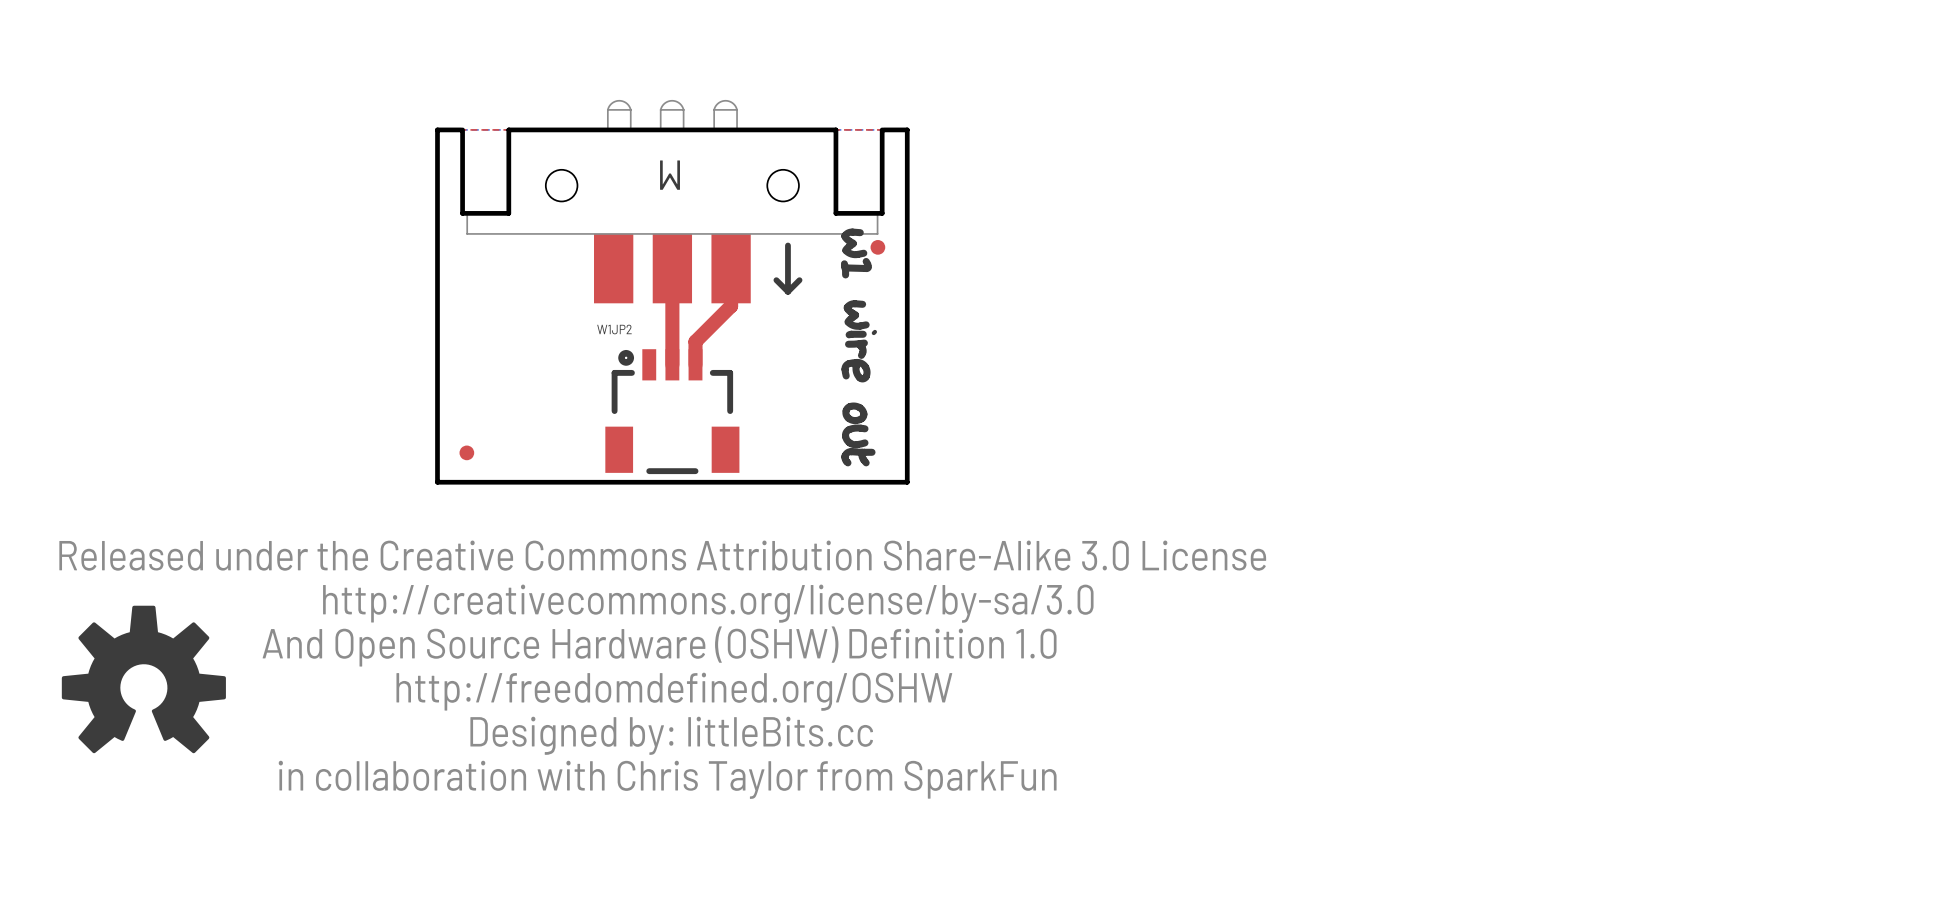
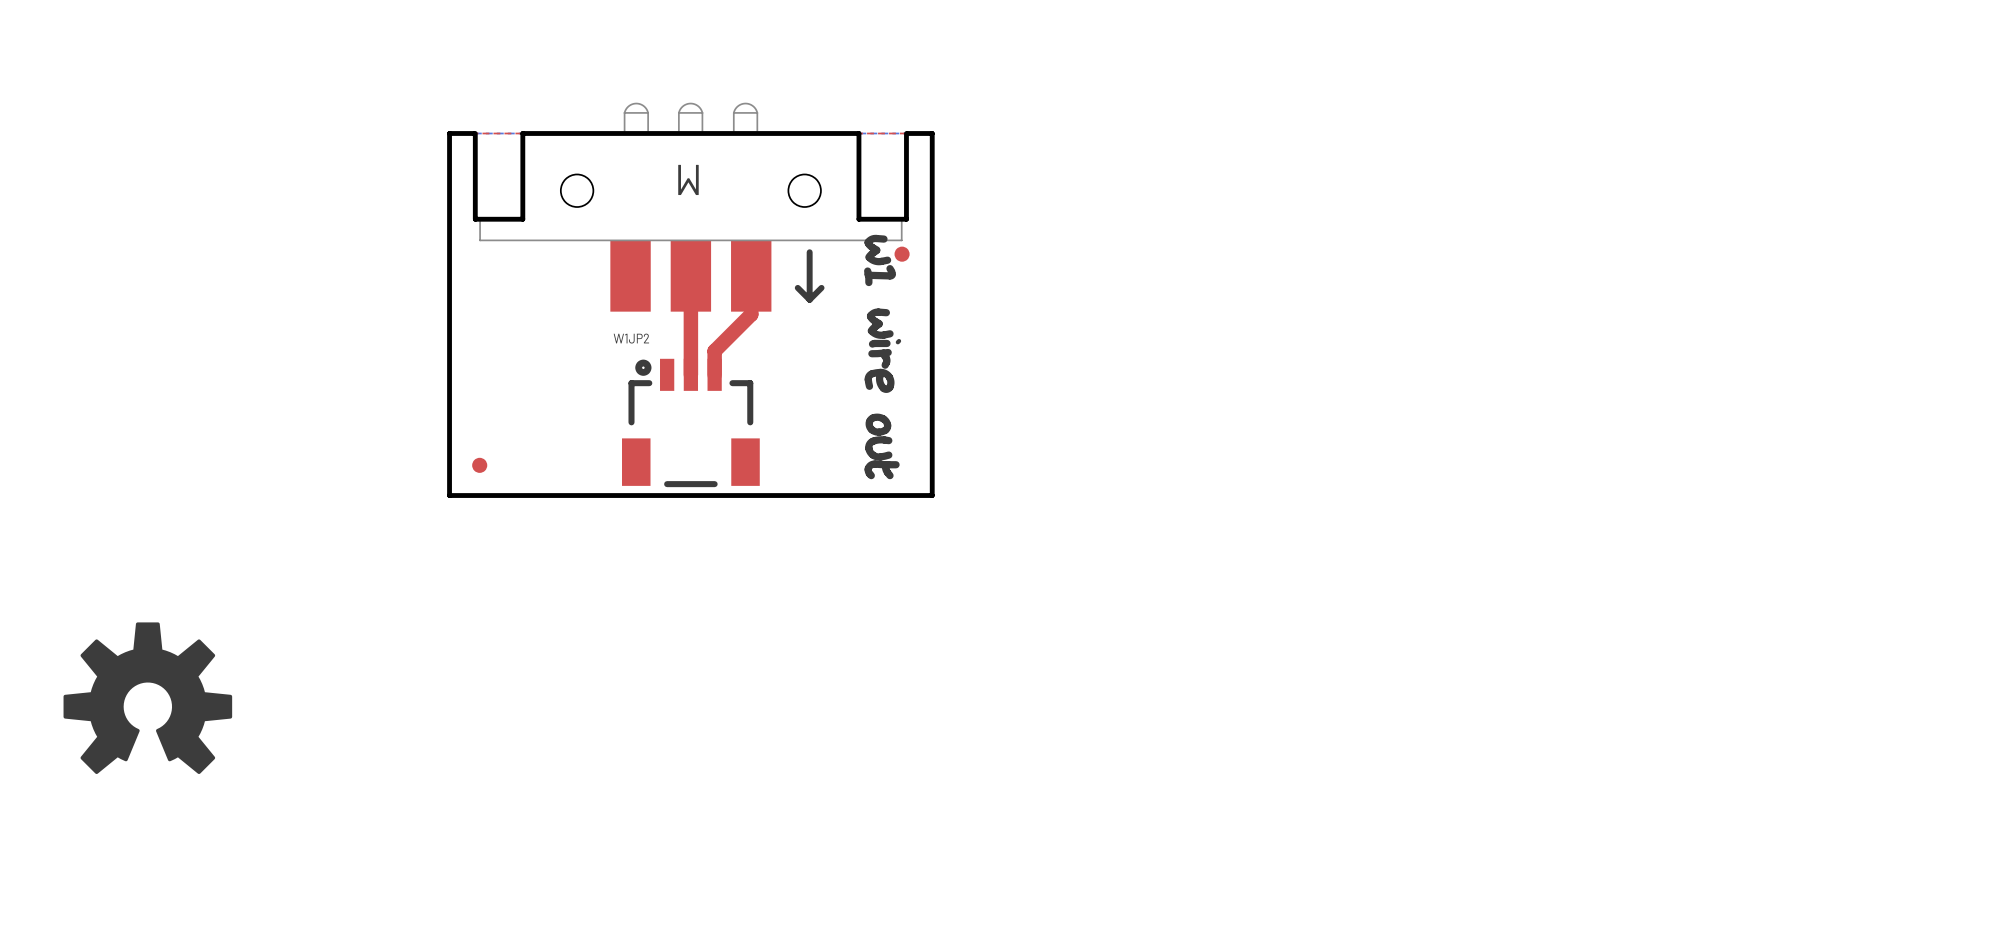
drawing: [59, 540, 1267, 799] -> none

